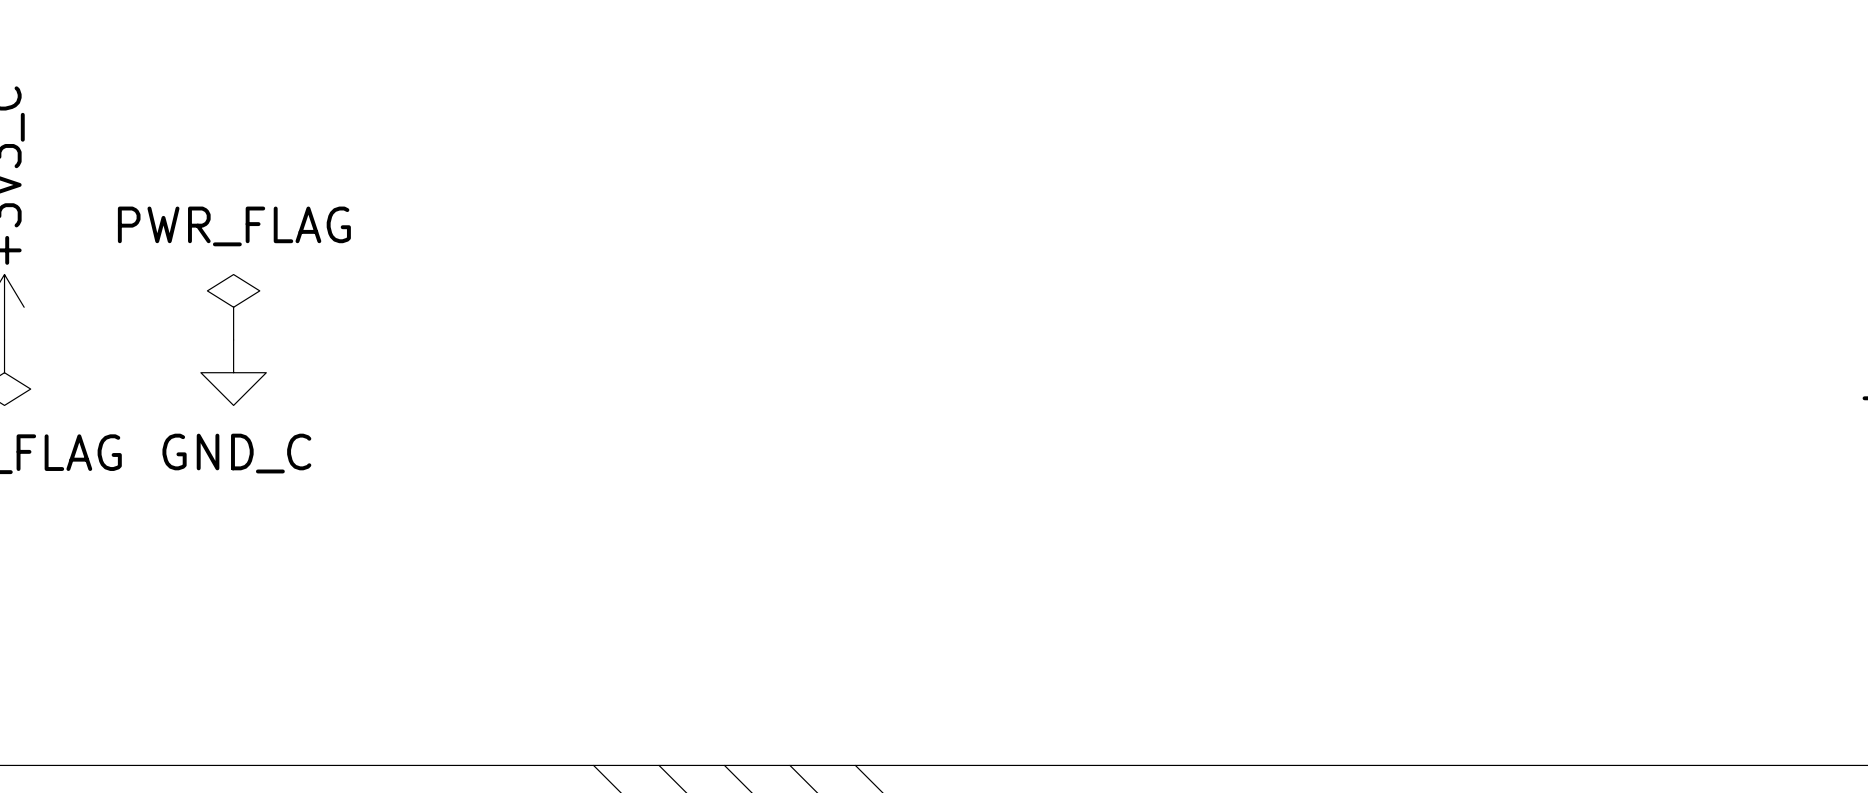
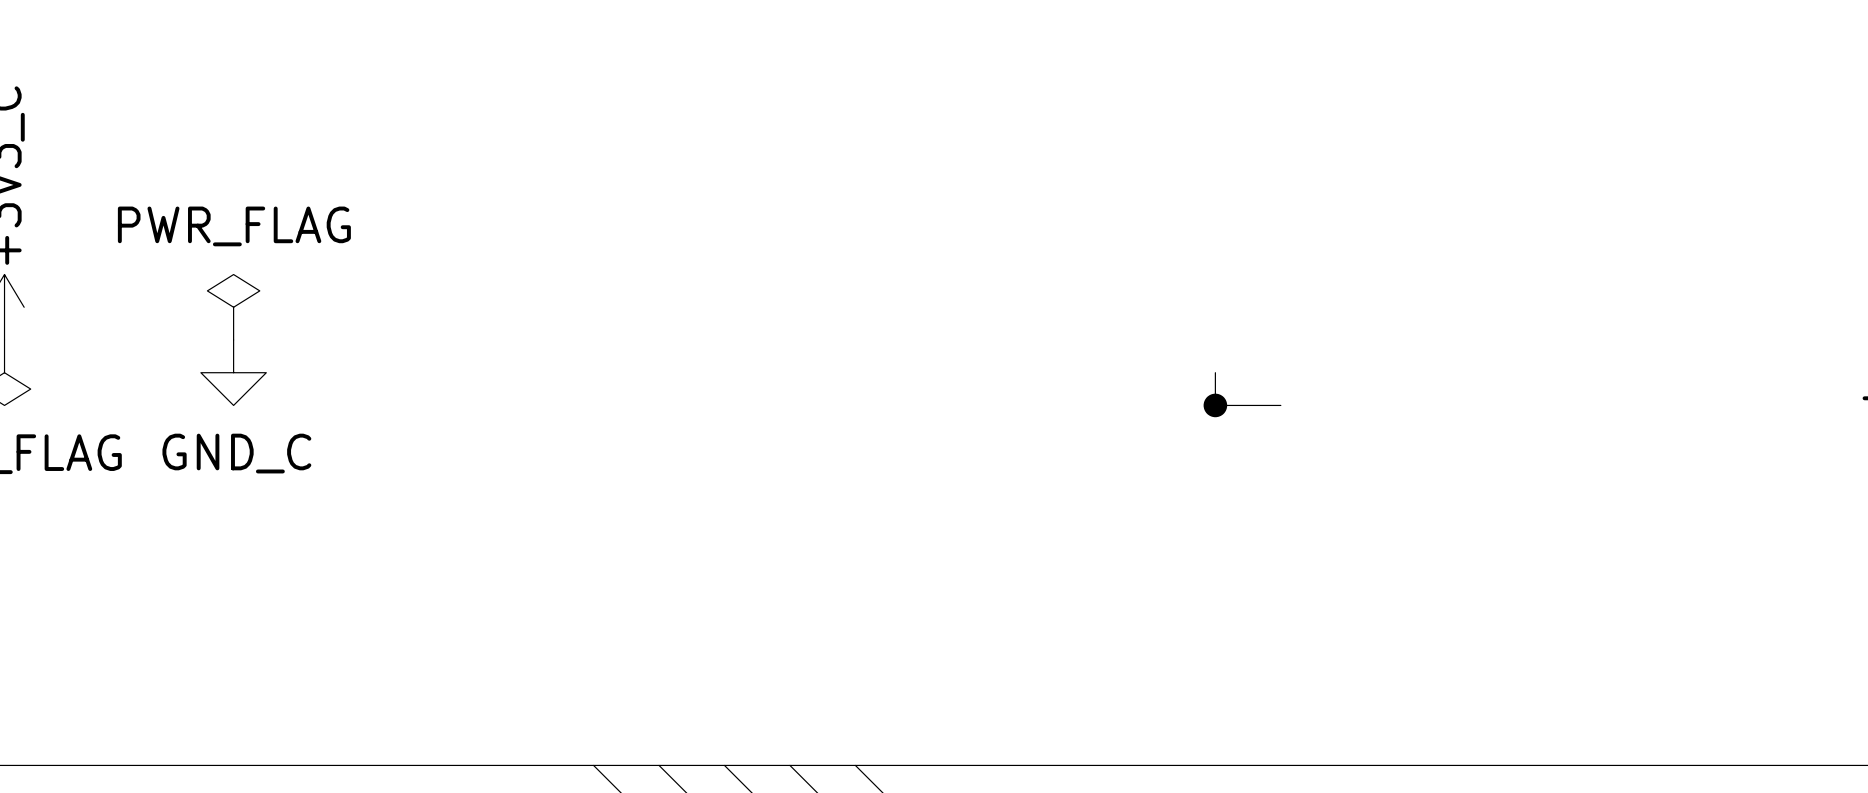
wire: none -> (1215, 372) (1215, 405) (1280, 405)
junction: none -> (1215, 405)

